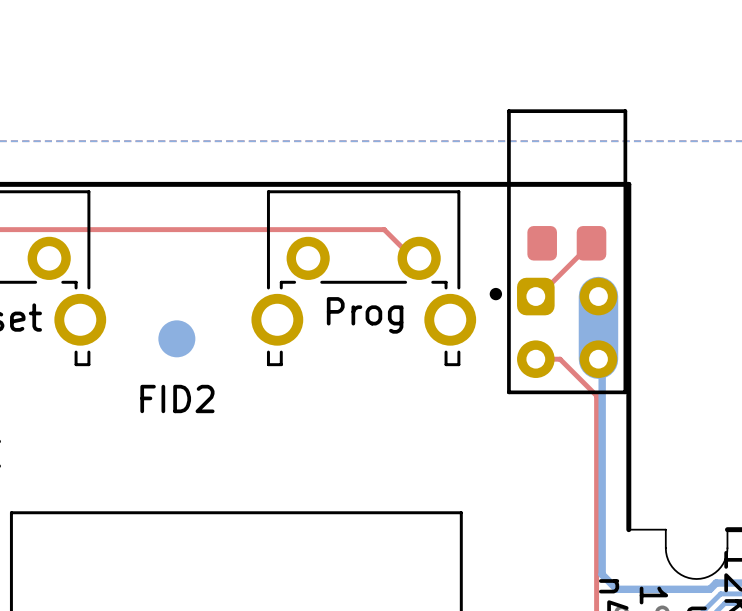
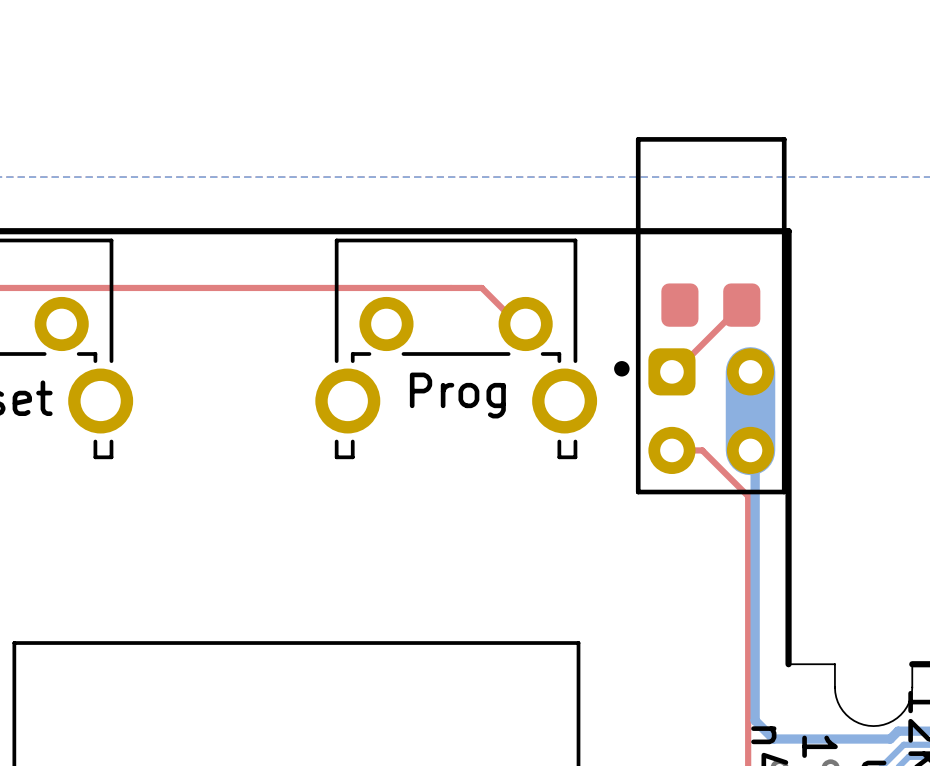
FID2: (176, 338) -> none

